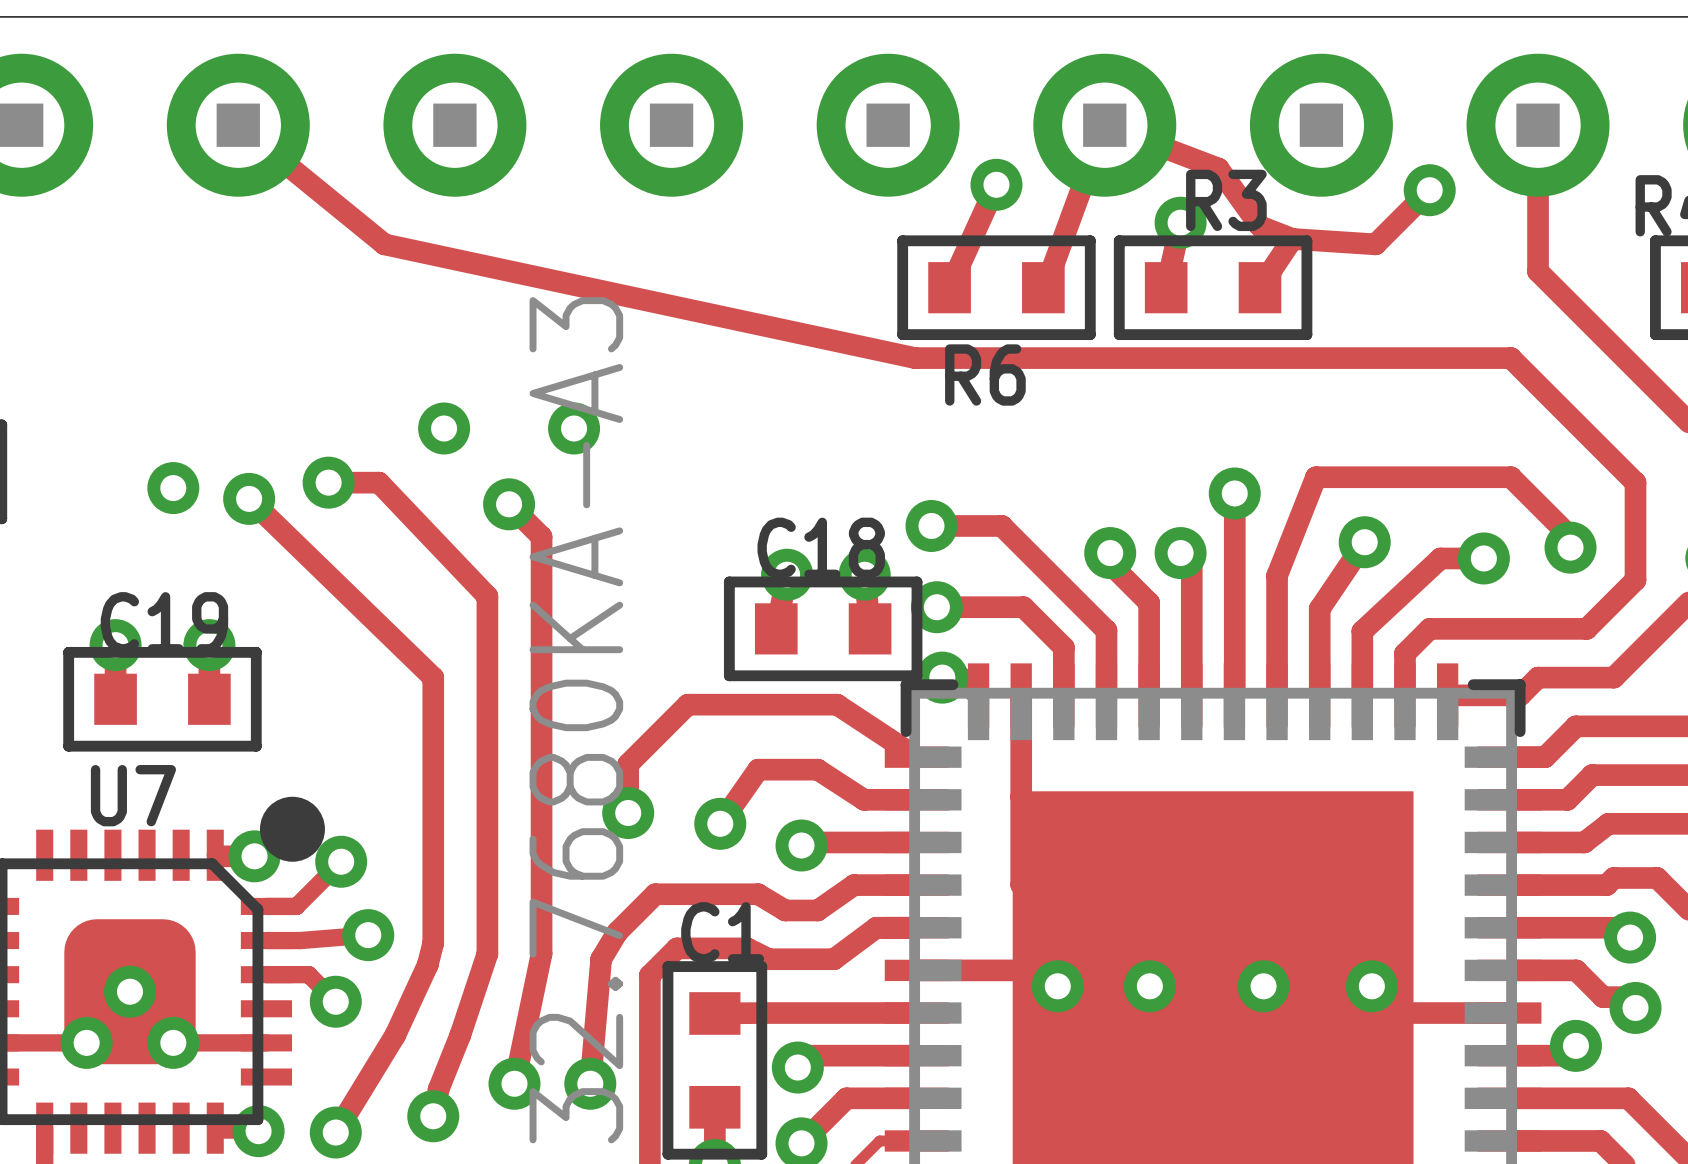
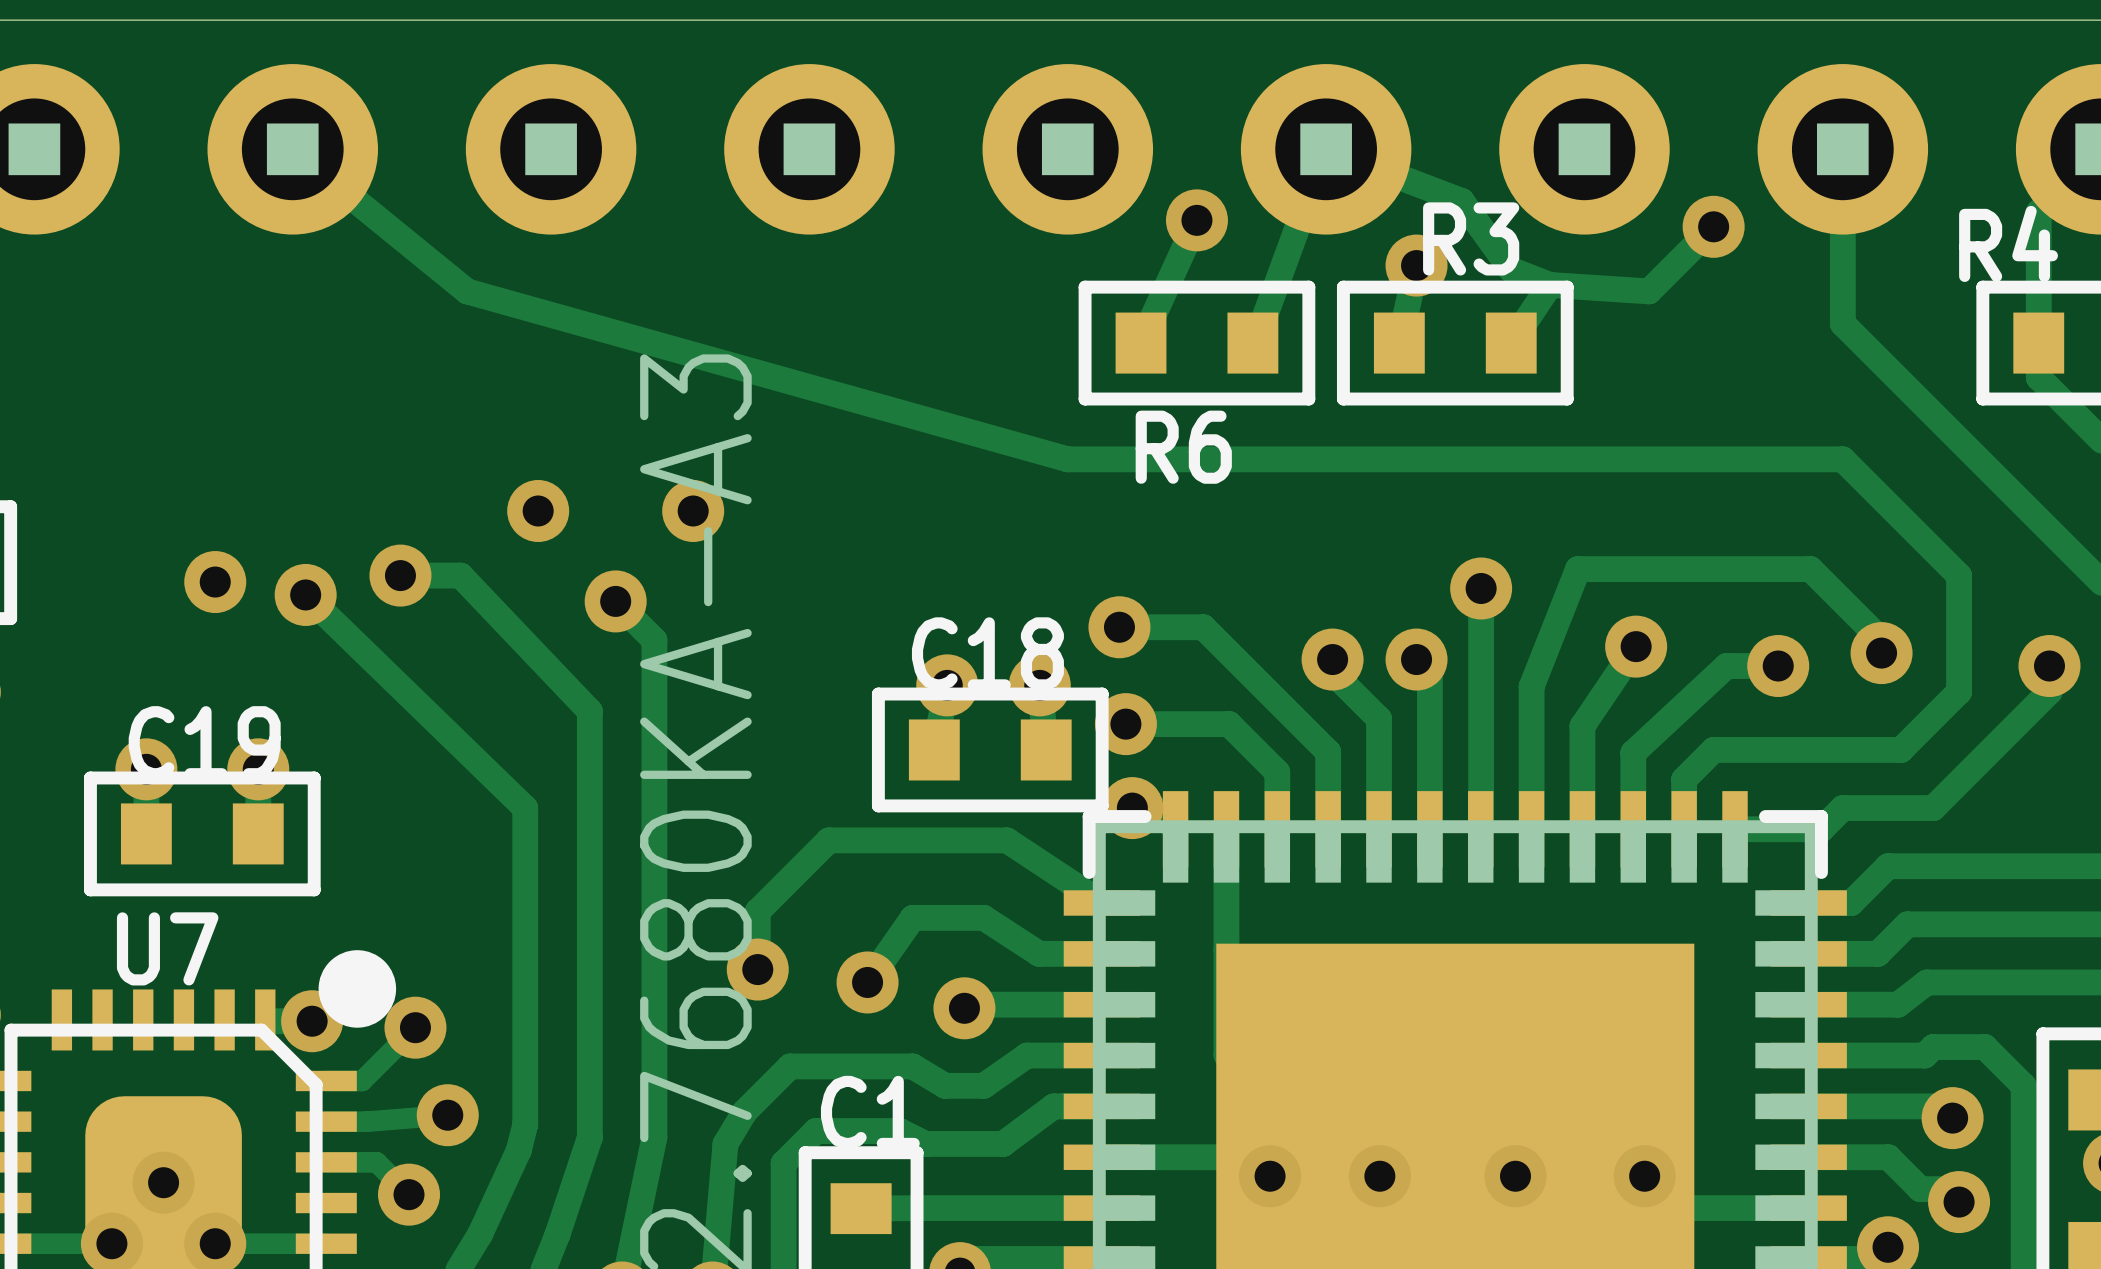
track: (384, 244) (915, 358) (1510, 358) (1538, 385) -> (467, 291) (1067, 459) (1842, 459)

